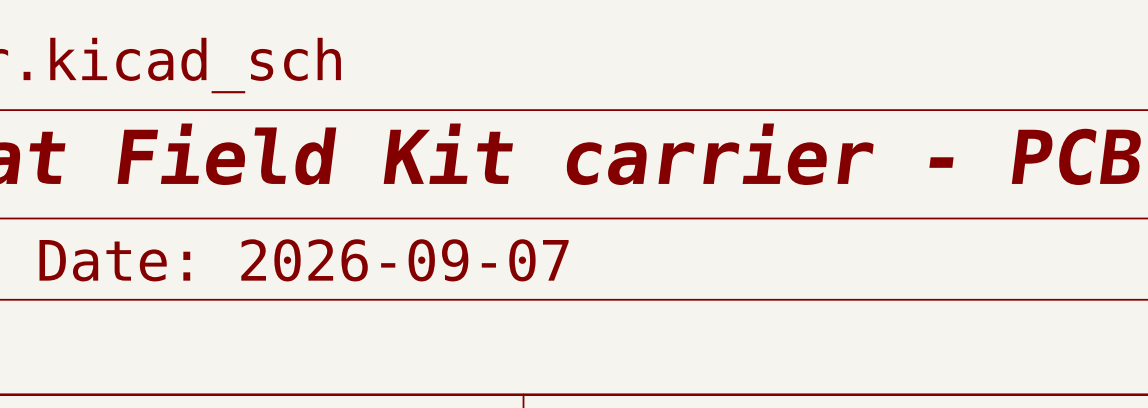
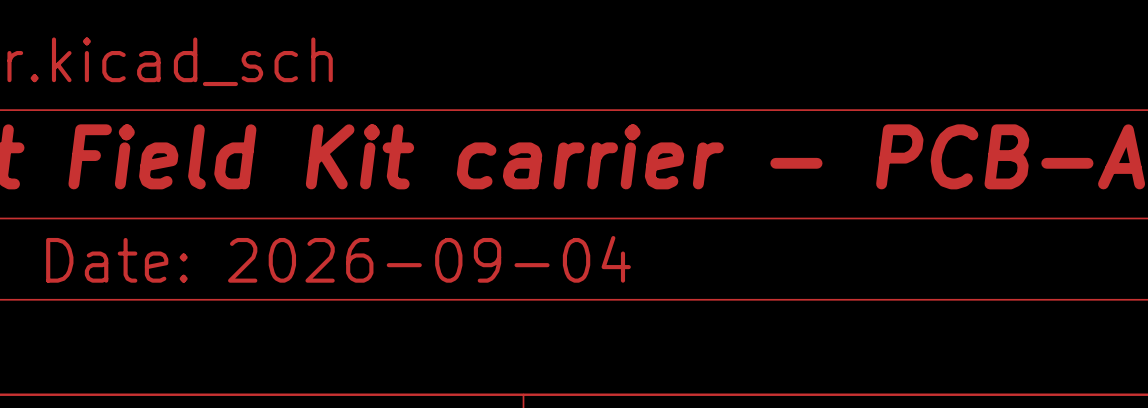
title block: Date: 2026-09-07 (304, 260) -> Date: 2026-09-04 (338, 259)

